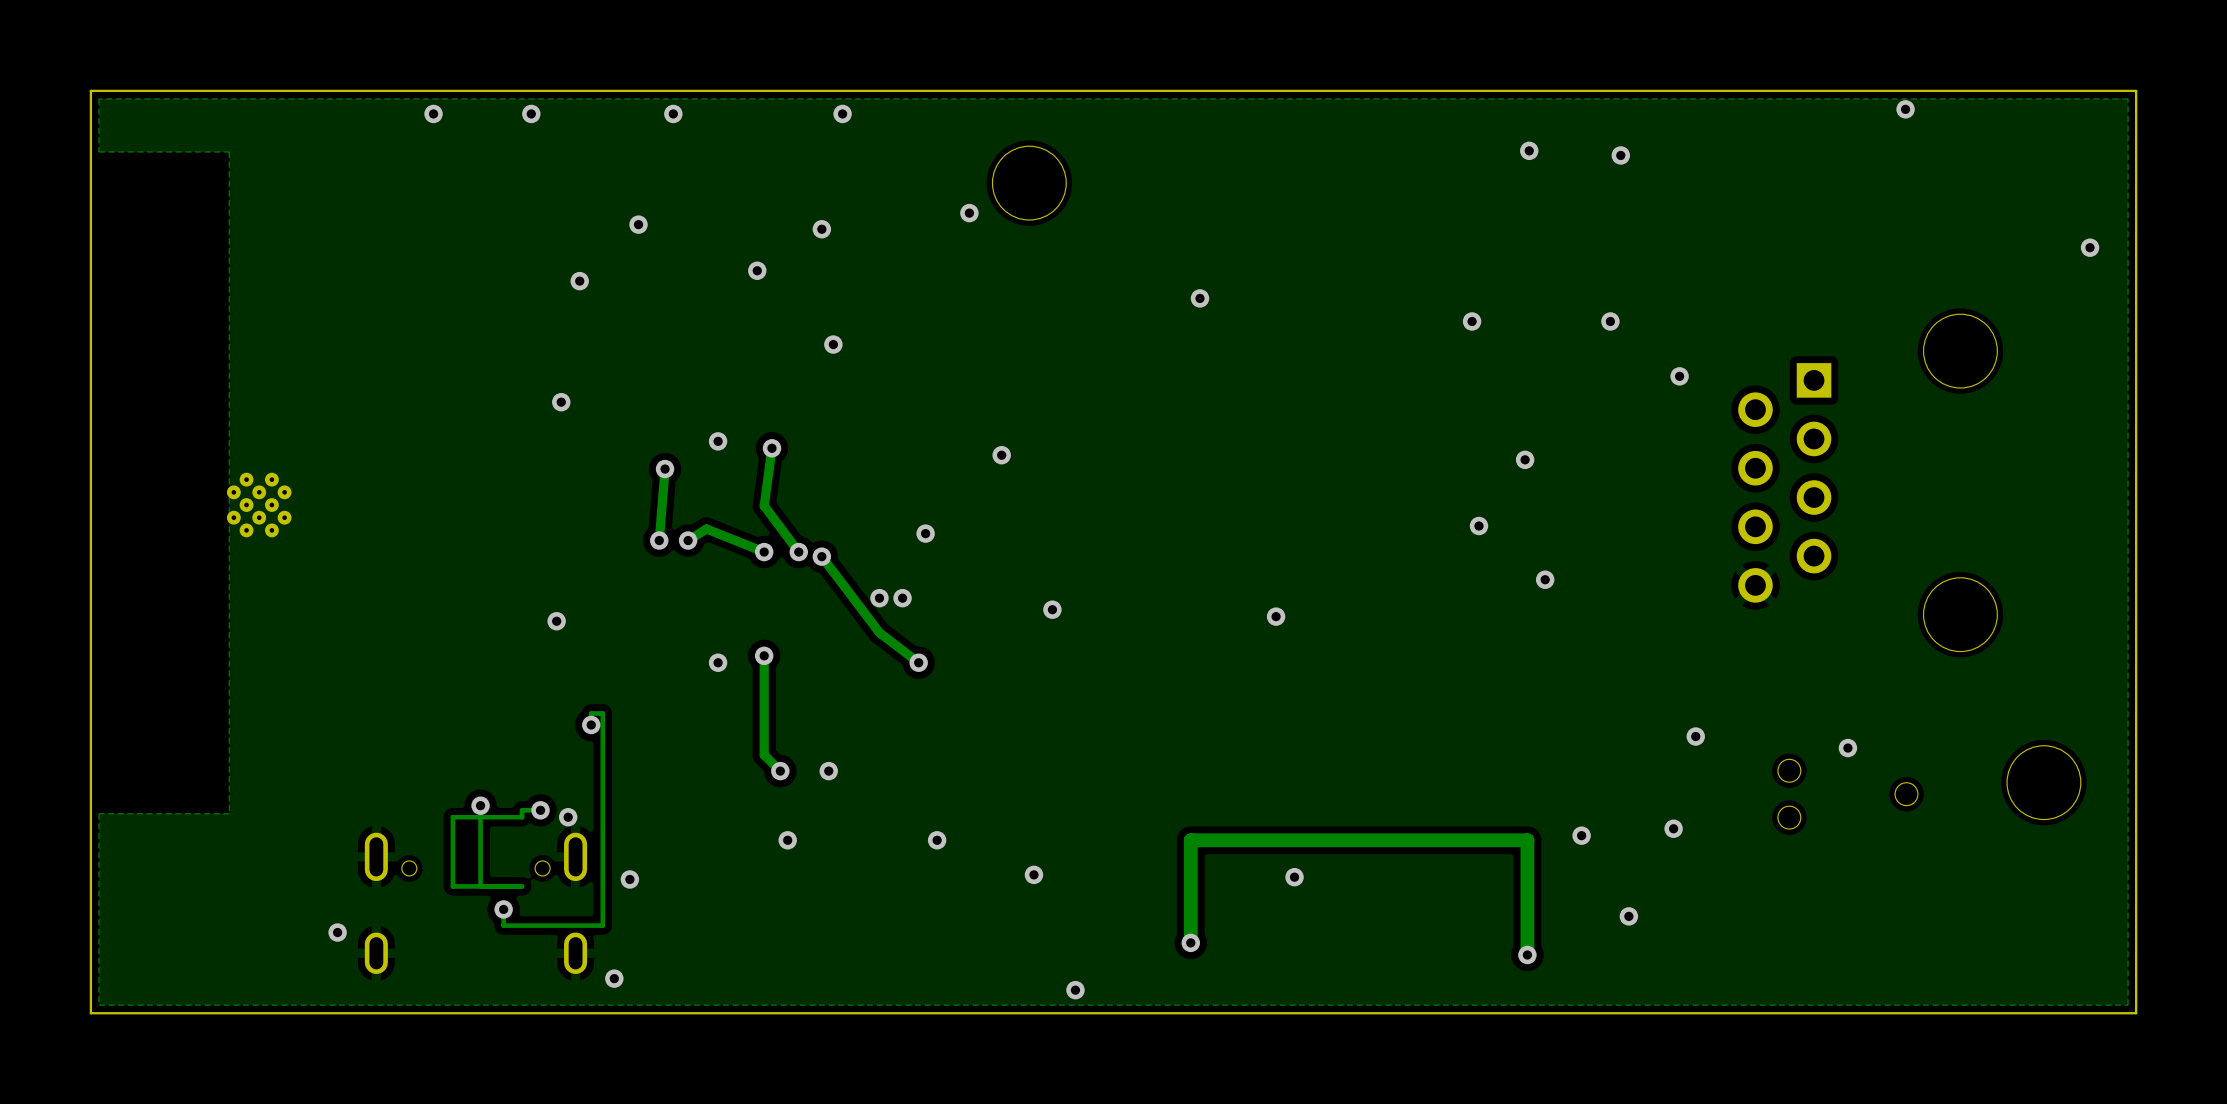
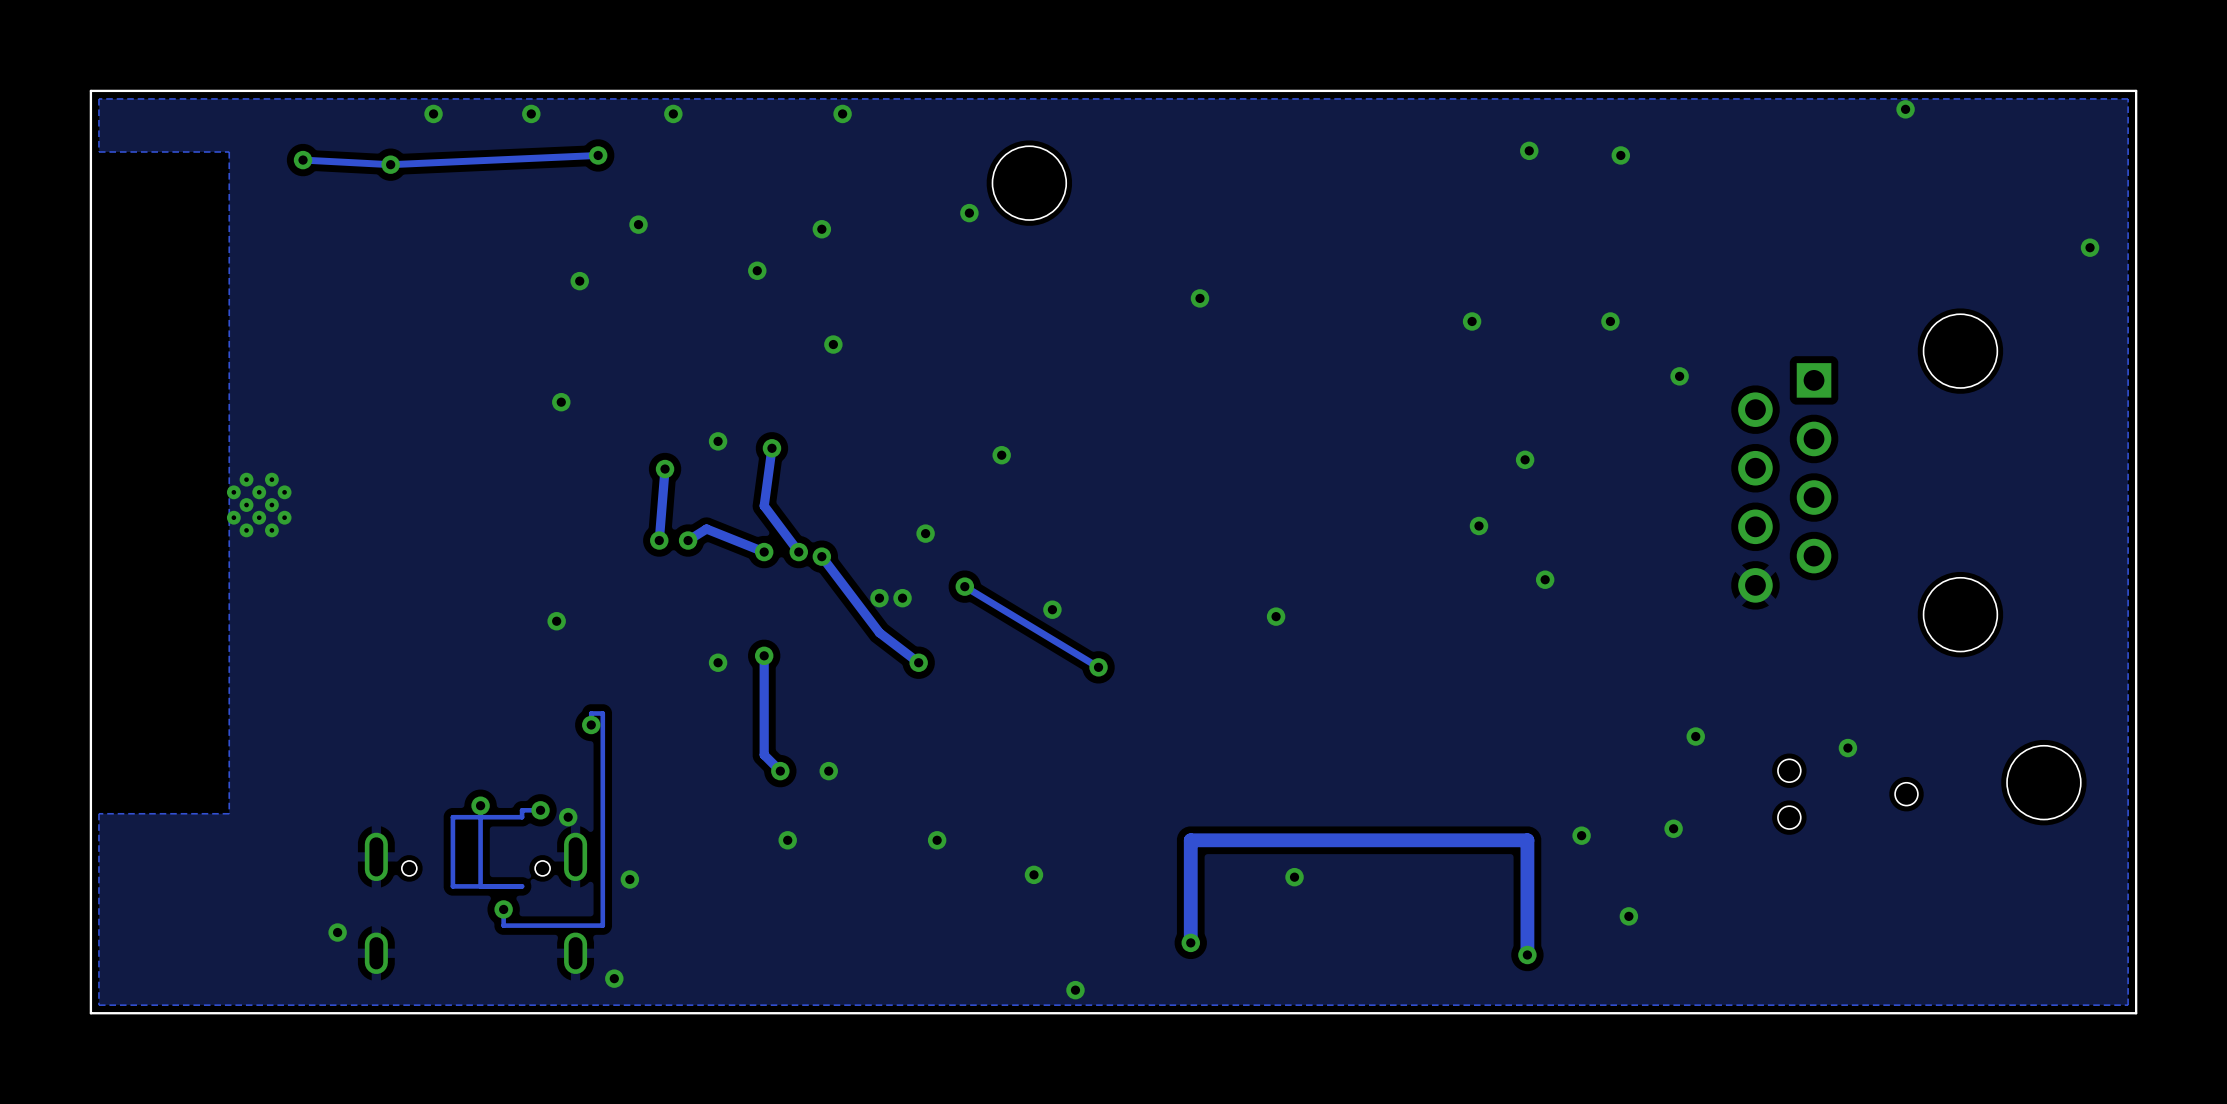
track: none -> (598, 155) (390, 164) (303, 160)
via: none -> (598, 155)
via: none -> (303, 160)
via: none -> (390, 164)
track: none -> (964, 586) (1098, 667)
via: none -> (964, 586)
via: none -> (1098, 667)

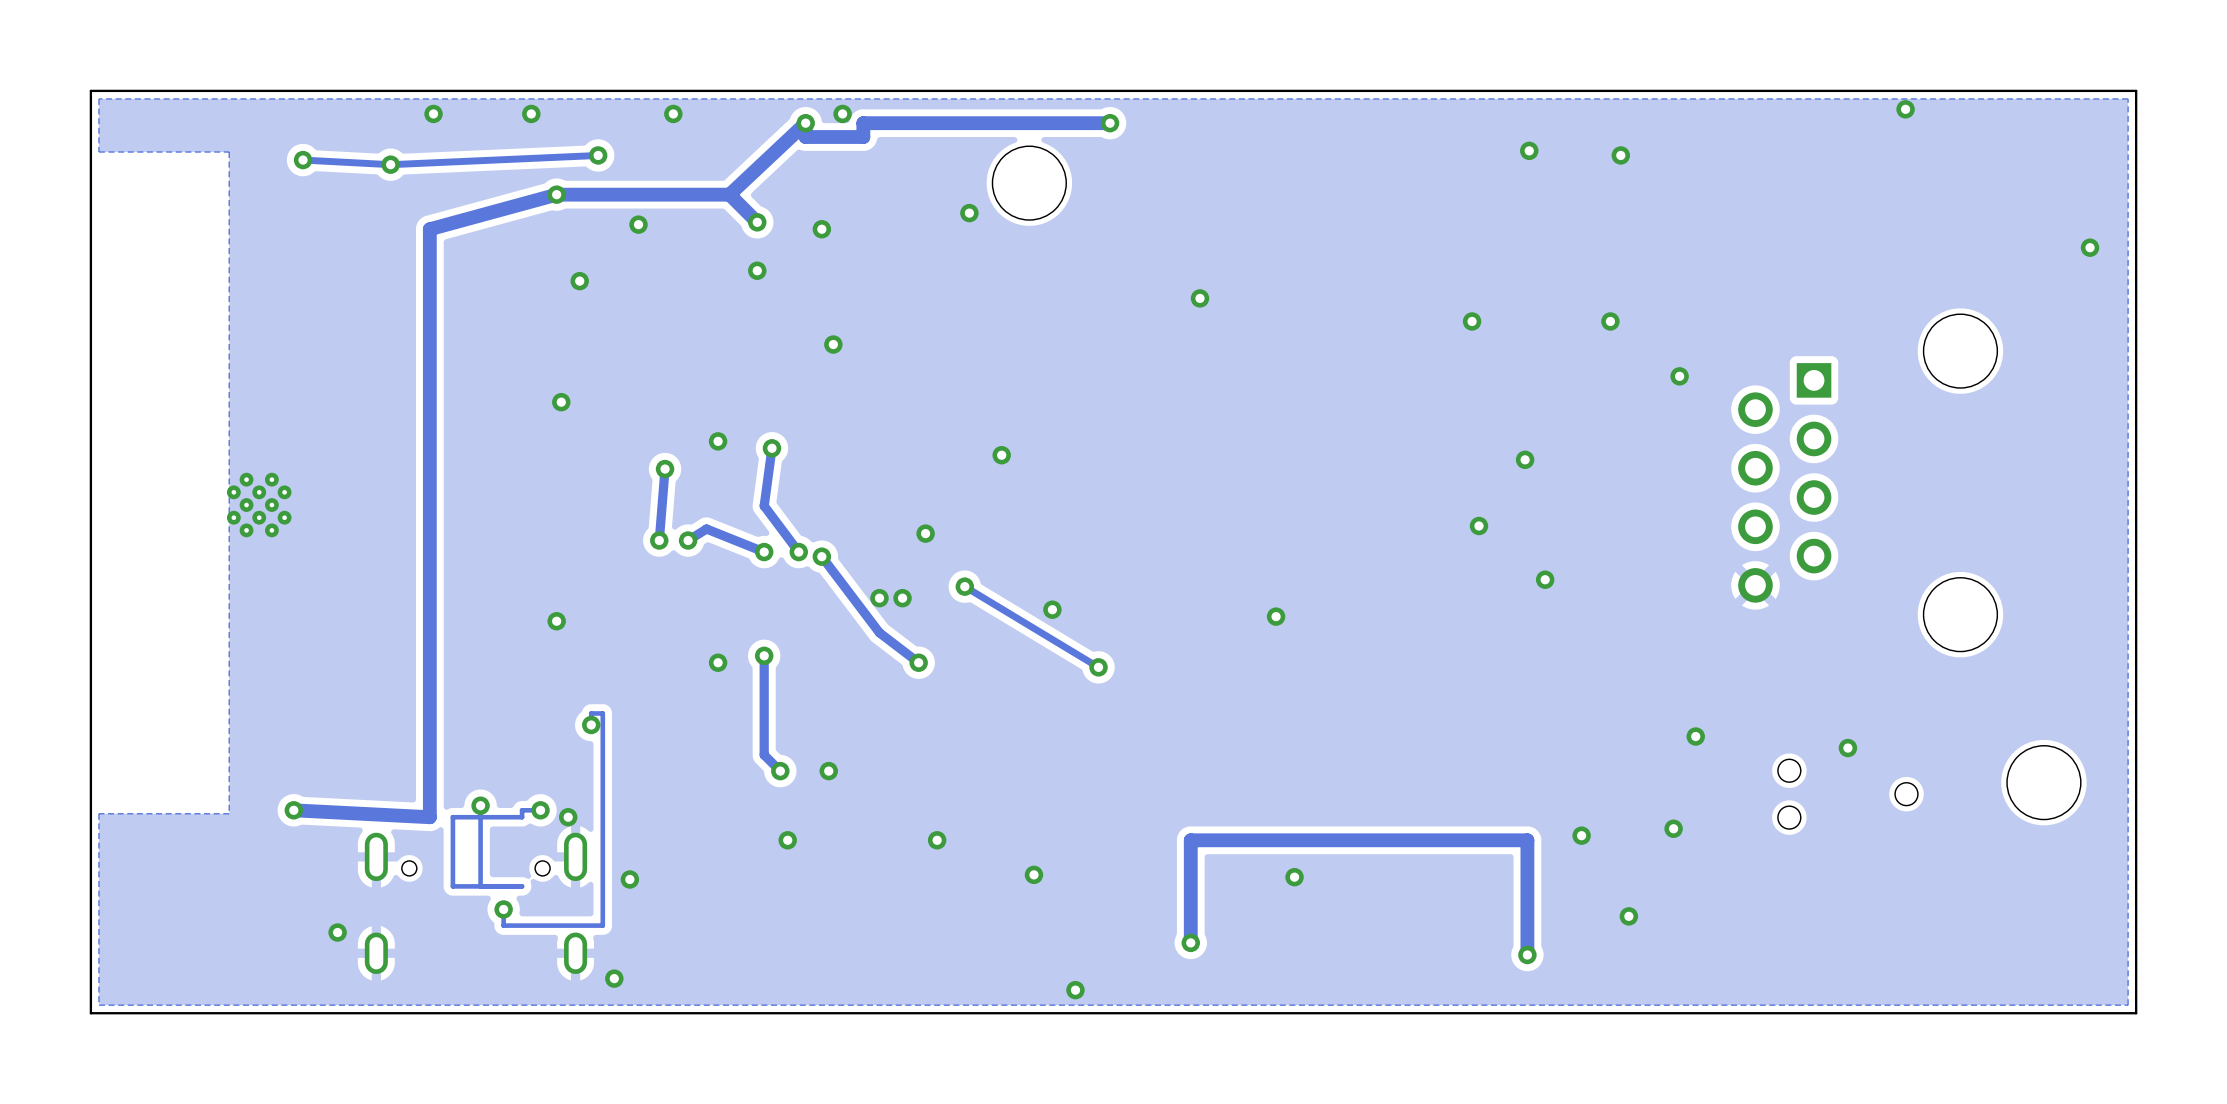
via: none -> (805, 123)
track: none -> (1110, 123) (863, 123) (863, 137) (805, 137) (805, 123) (729, 194)
via: none -> (1110, 123)
via: none -> (556, 194)
track: none -> (729, 194) (556, 194) (429, 229) (429, 817) (293, 810)
track: none -> (729, 194) (757, 222)
via: none -> (757, 222)
via: none -> (293, 810)

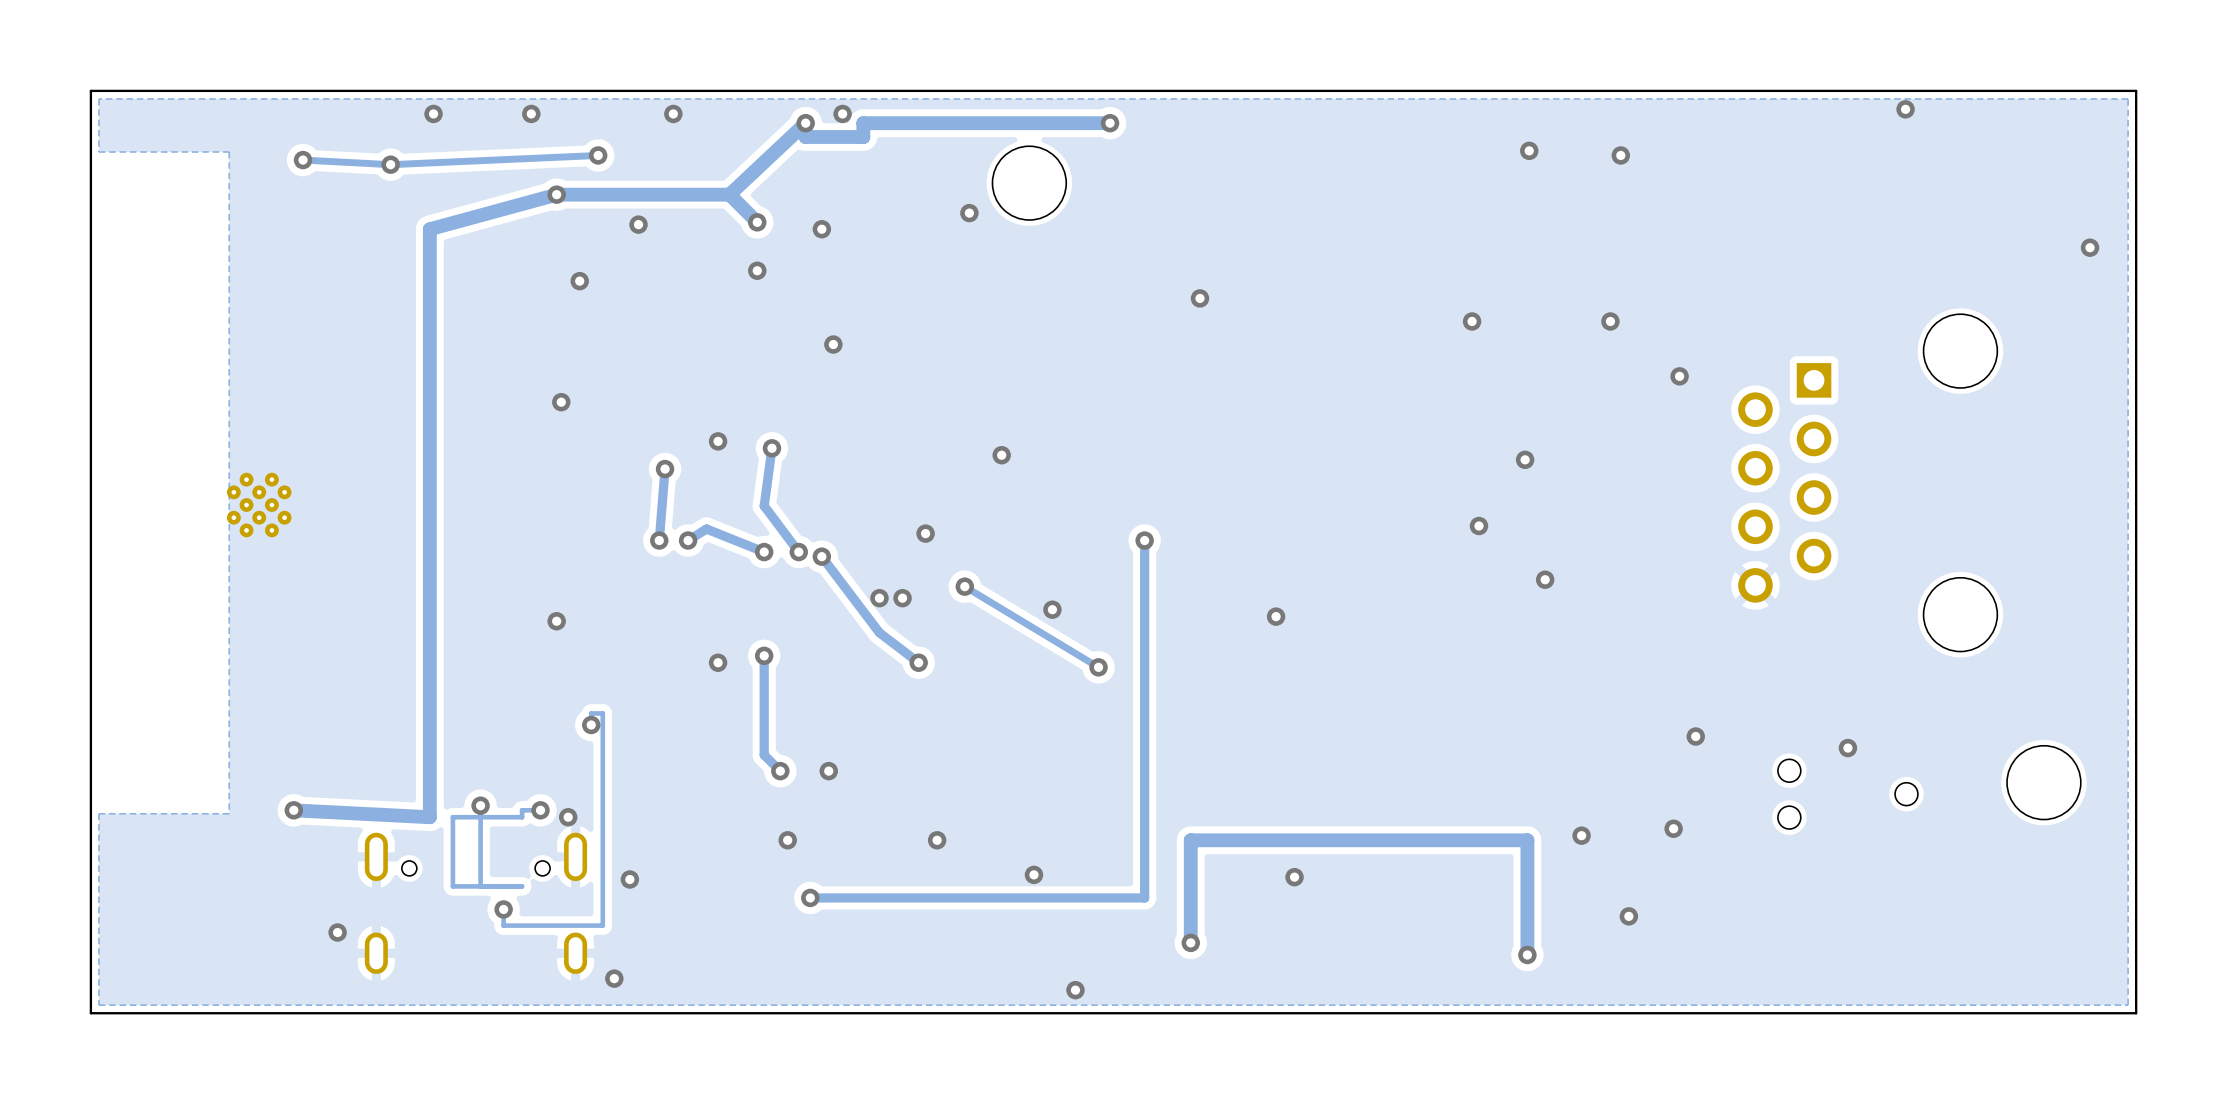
track: none -> (1144, 540) (1144, 897) (810, 897)
via: none -> (1144, 540)
via: none -> (810, 897)

